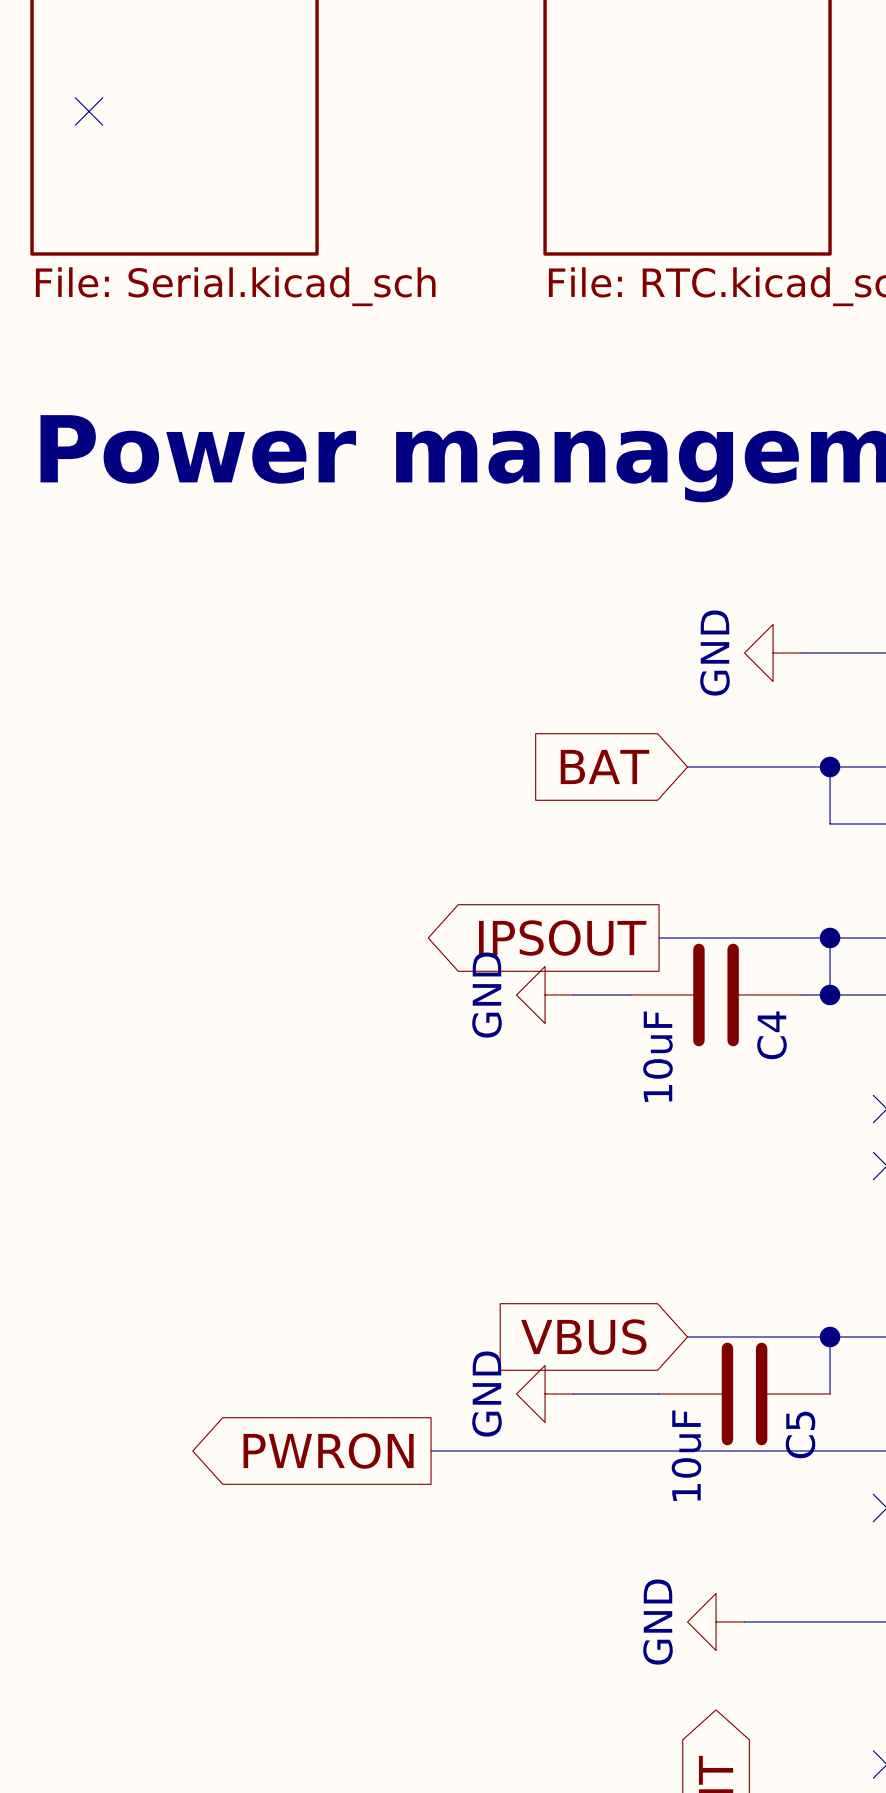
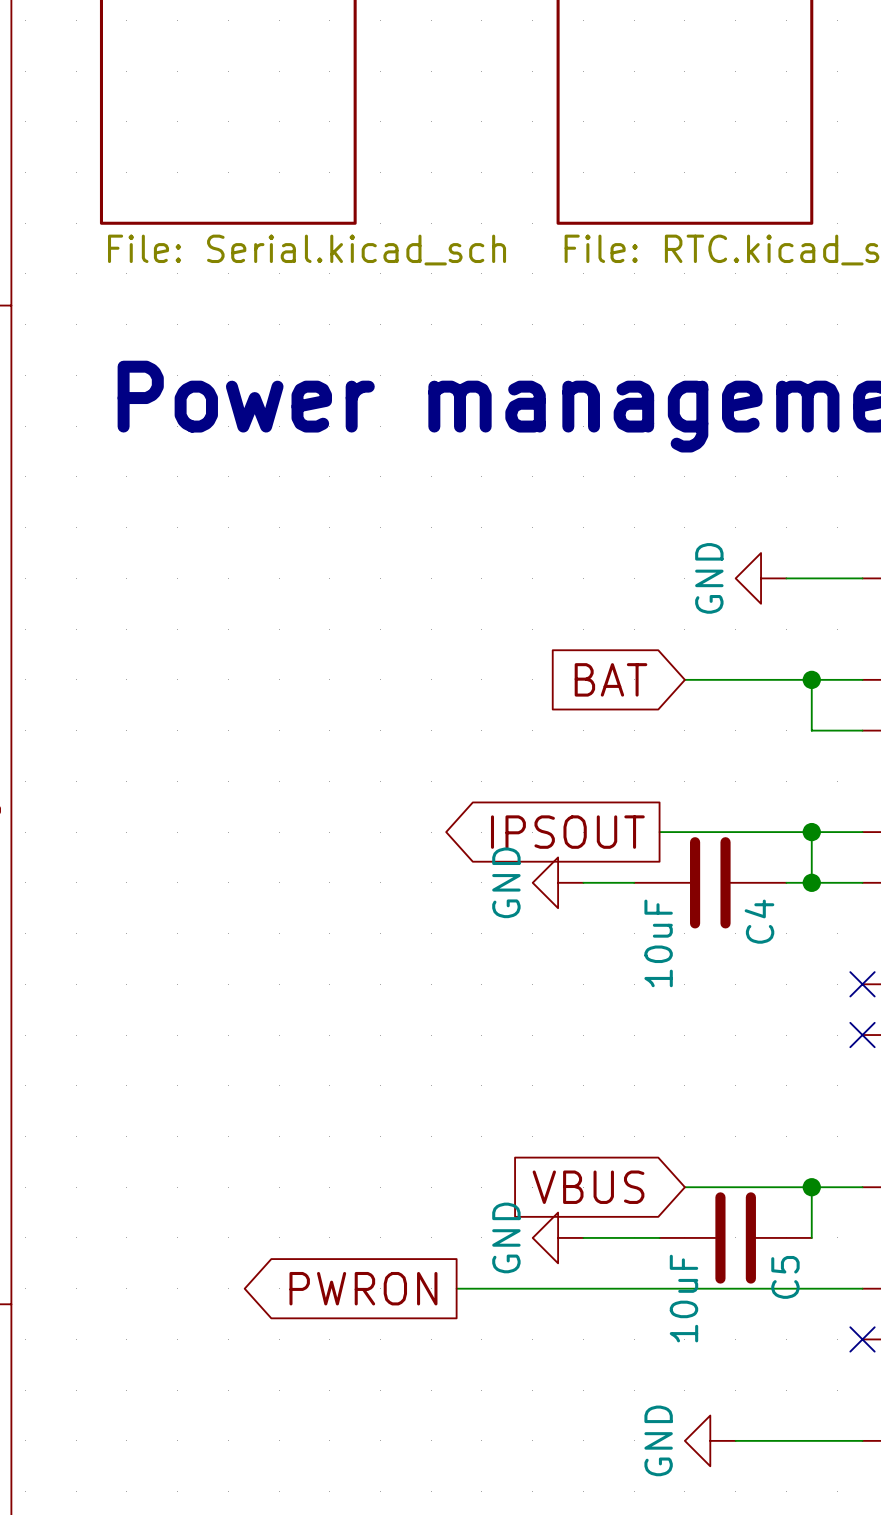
no-connect mark: (89, 111) -> none

